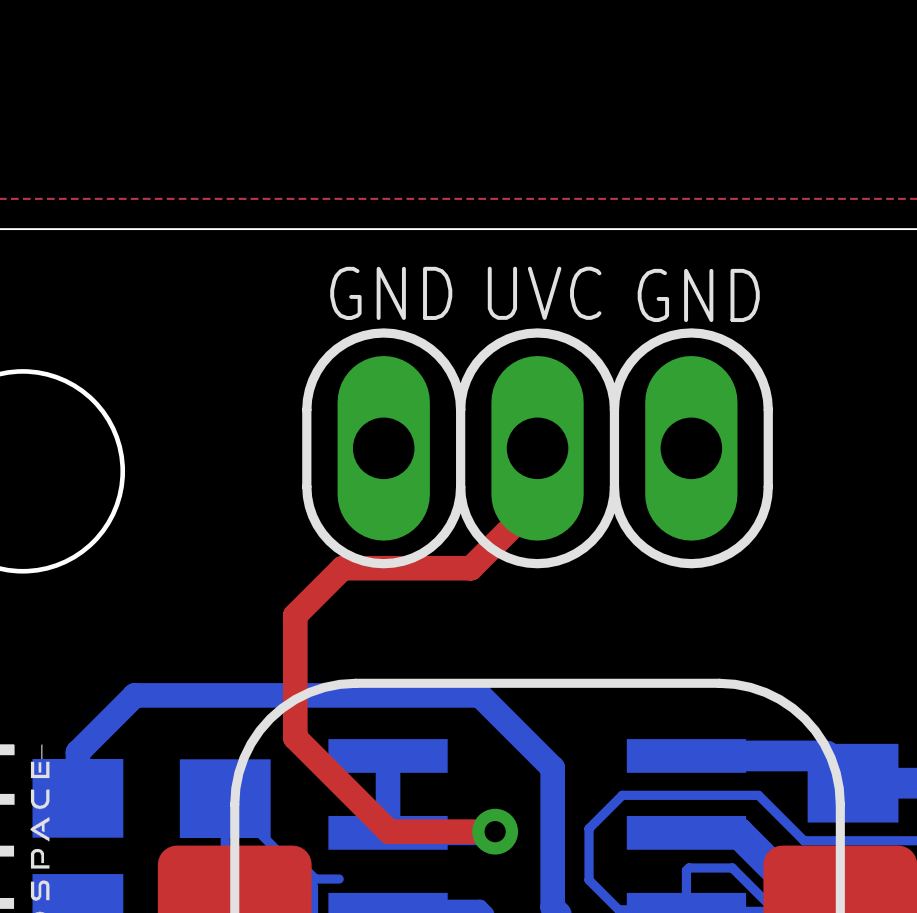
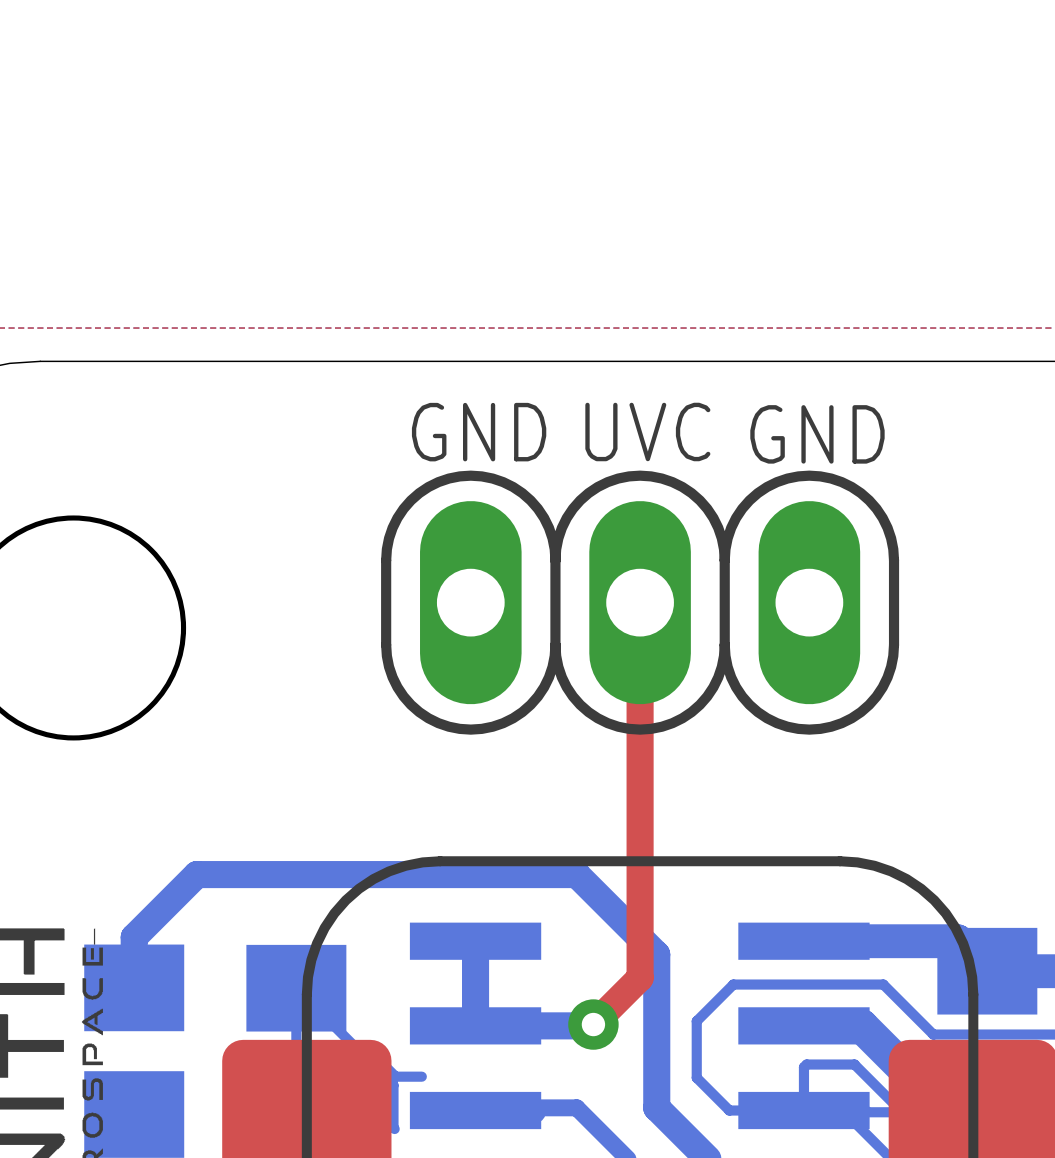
top track: (537, 501) (470, 568) (342, 568) (295, 615) (295, 737) (389, 831) (495, 831) -> (640, 661) (640, 977) (593, 1024)

